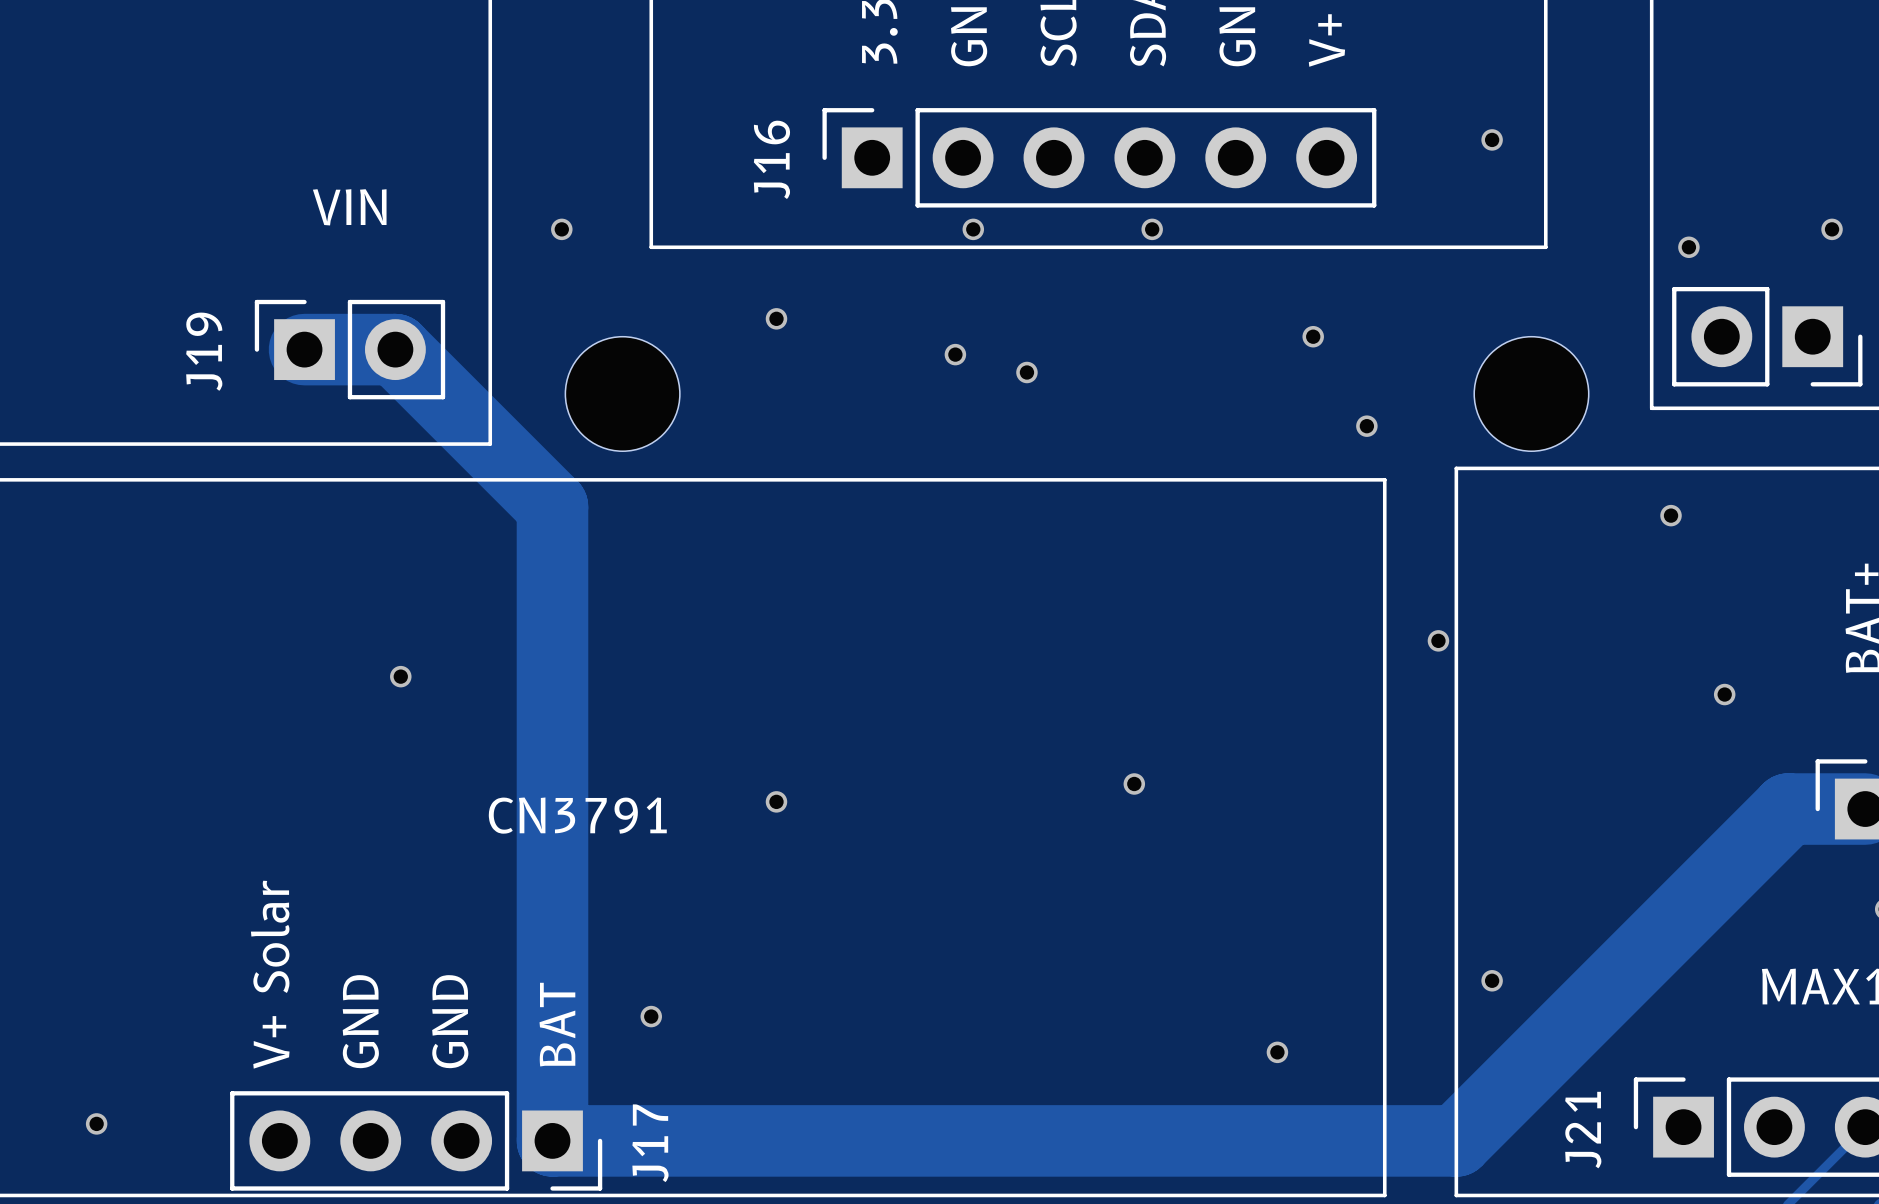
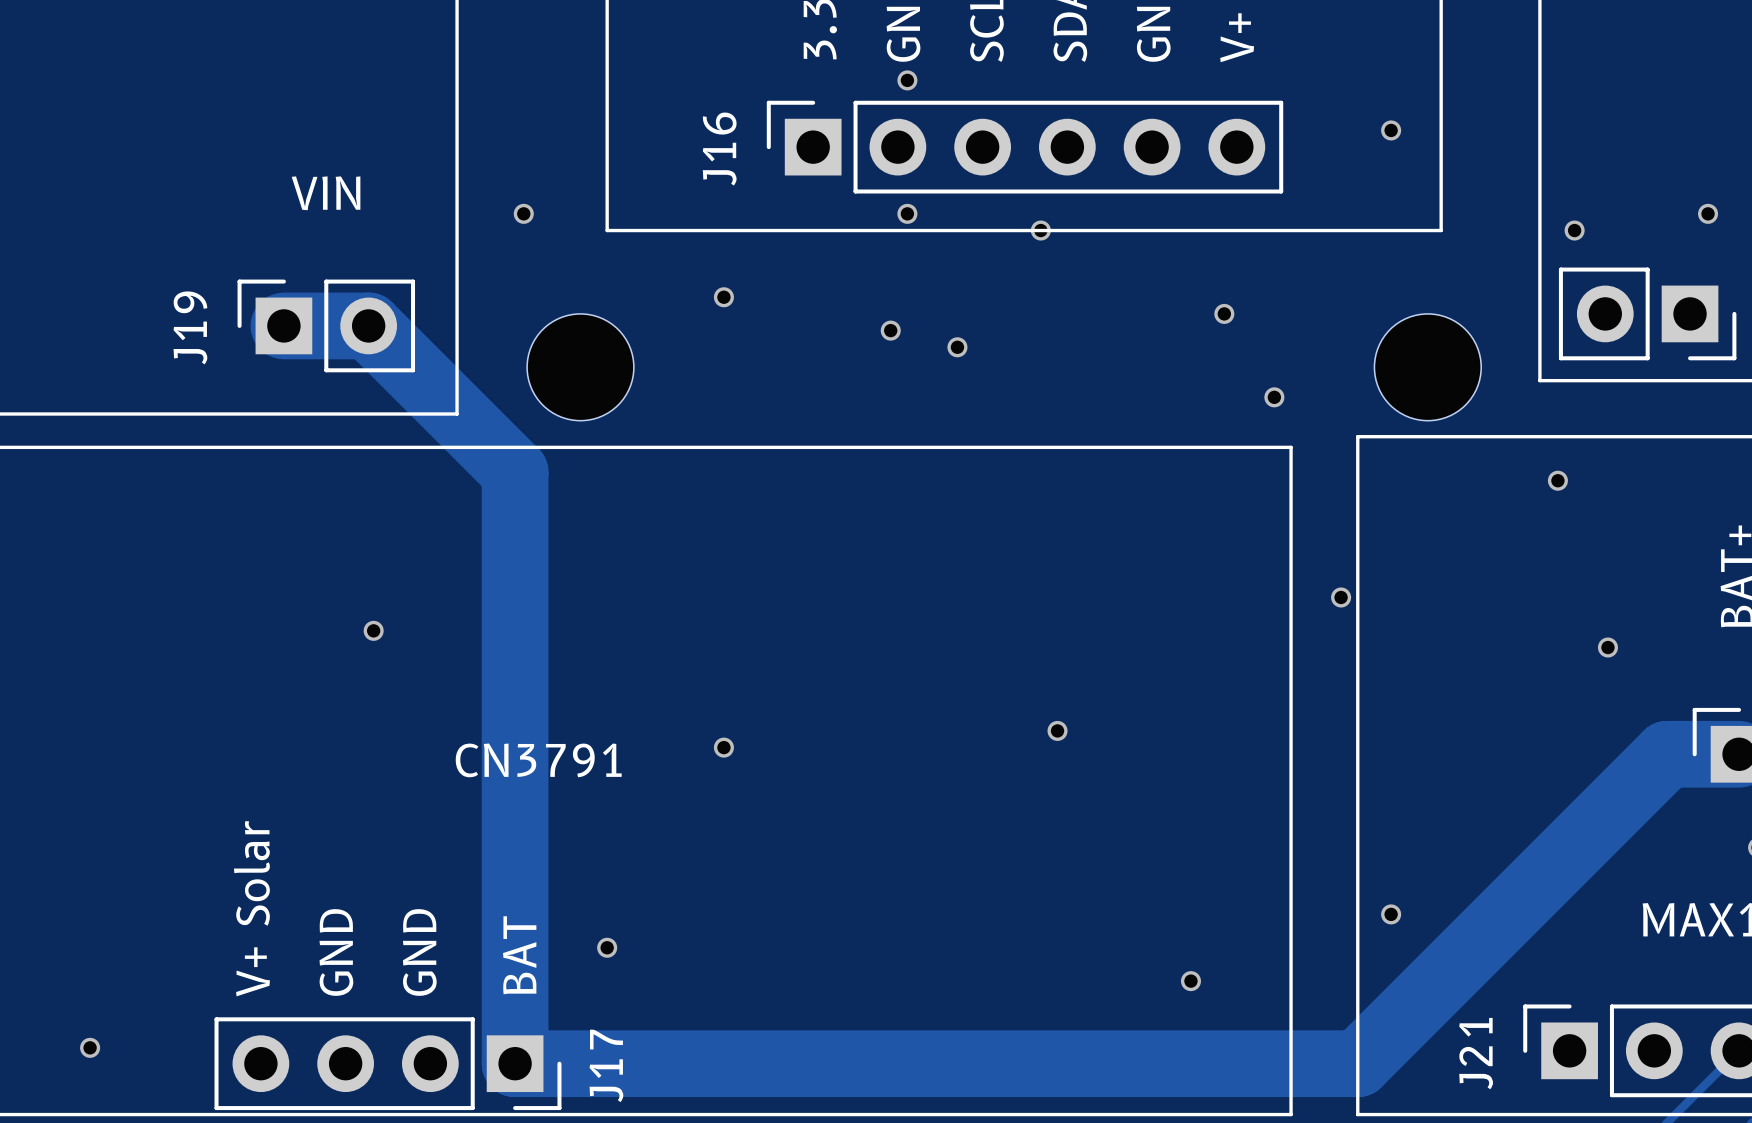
via: none -> (907, 80)
via position: (1152, 229) -> (1040, 230)

